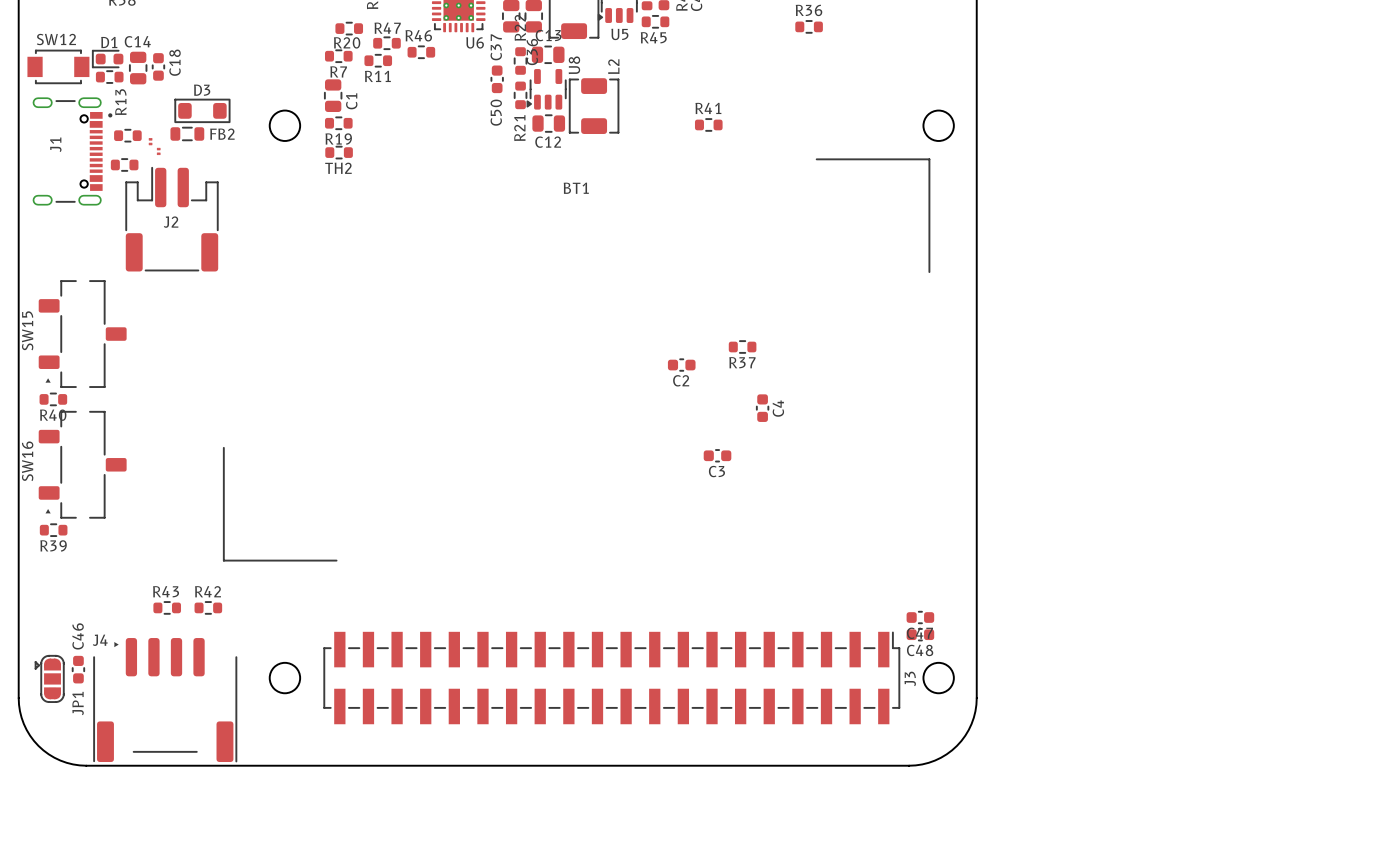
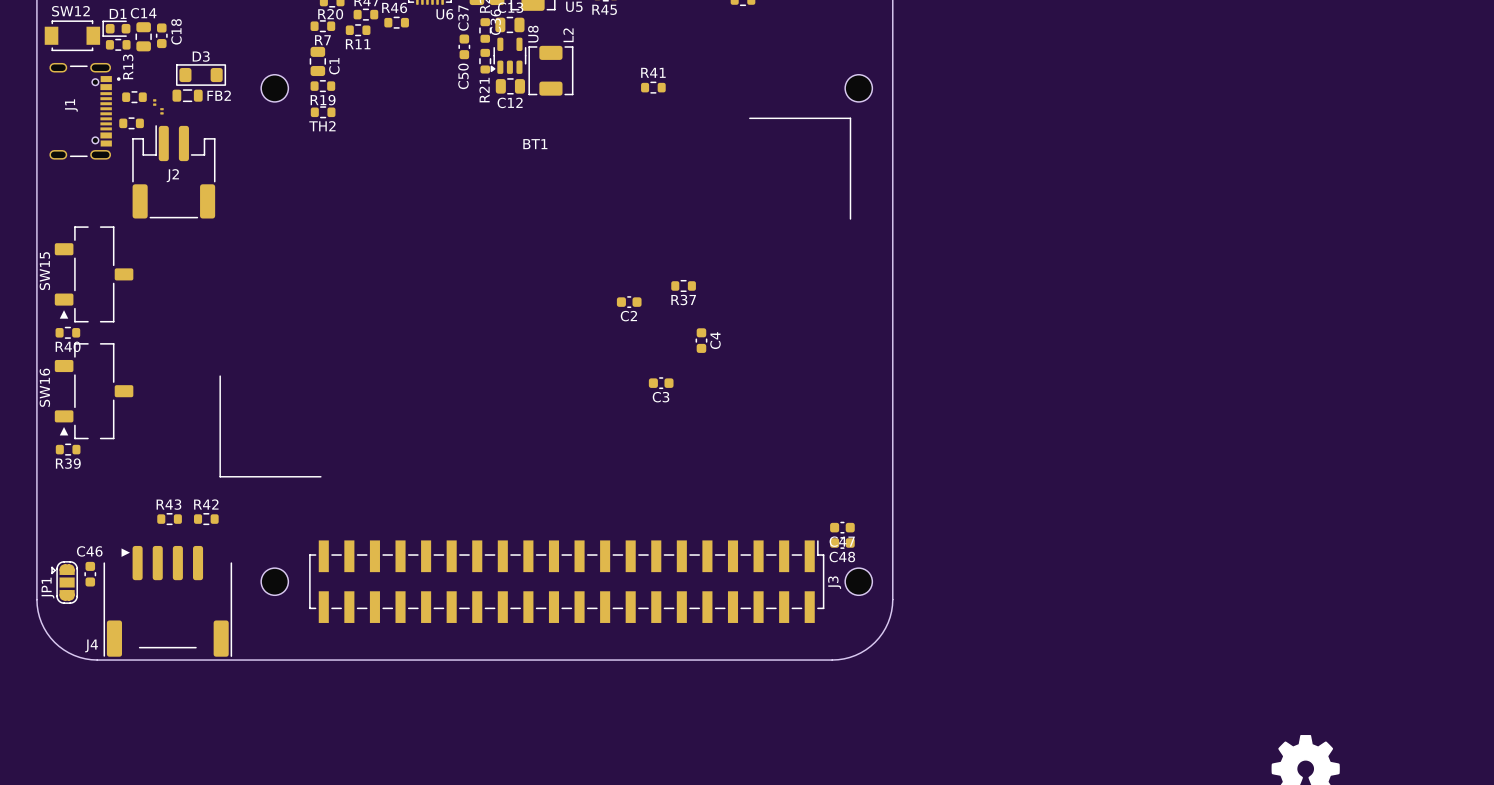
C46 name rotation: 0° (78, 636) -> 90° clockwise (89, 551)
J4 name position: J4 (100, 640) -> J4 (91, 645)
JP1 name position: JP1 (78, 703) -> JP1 (48, 588)

